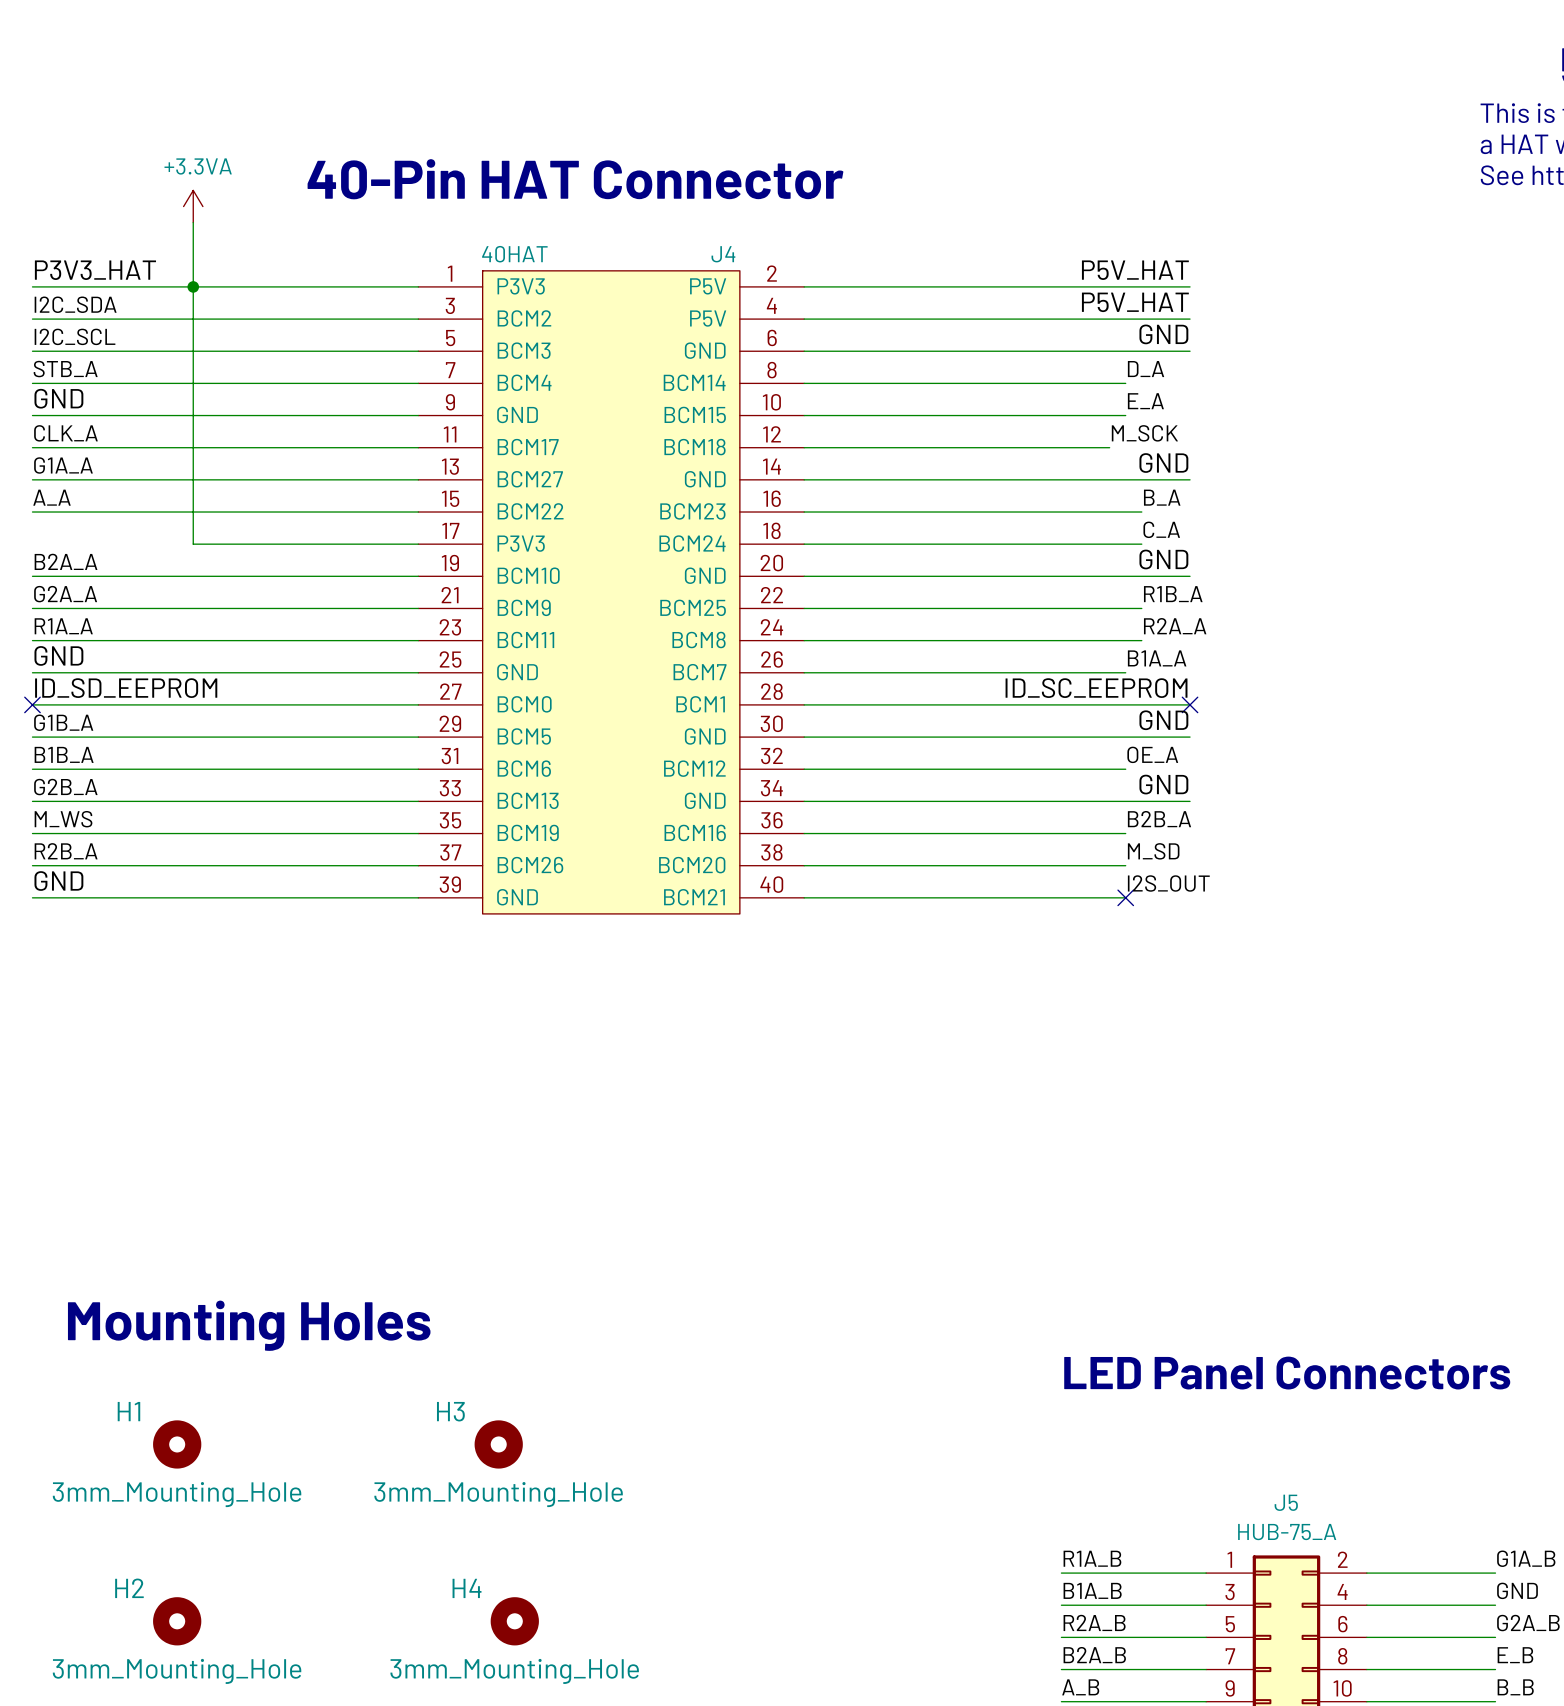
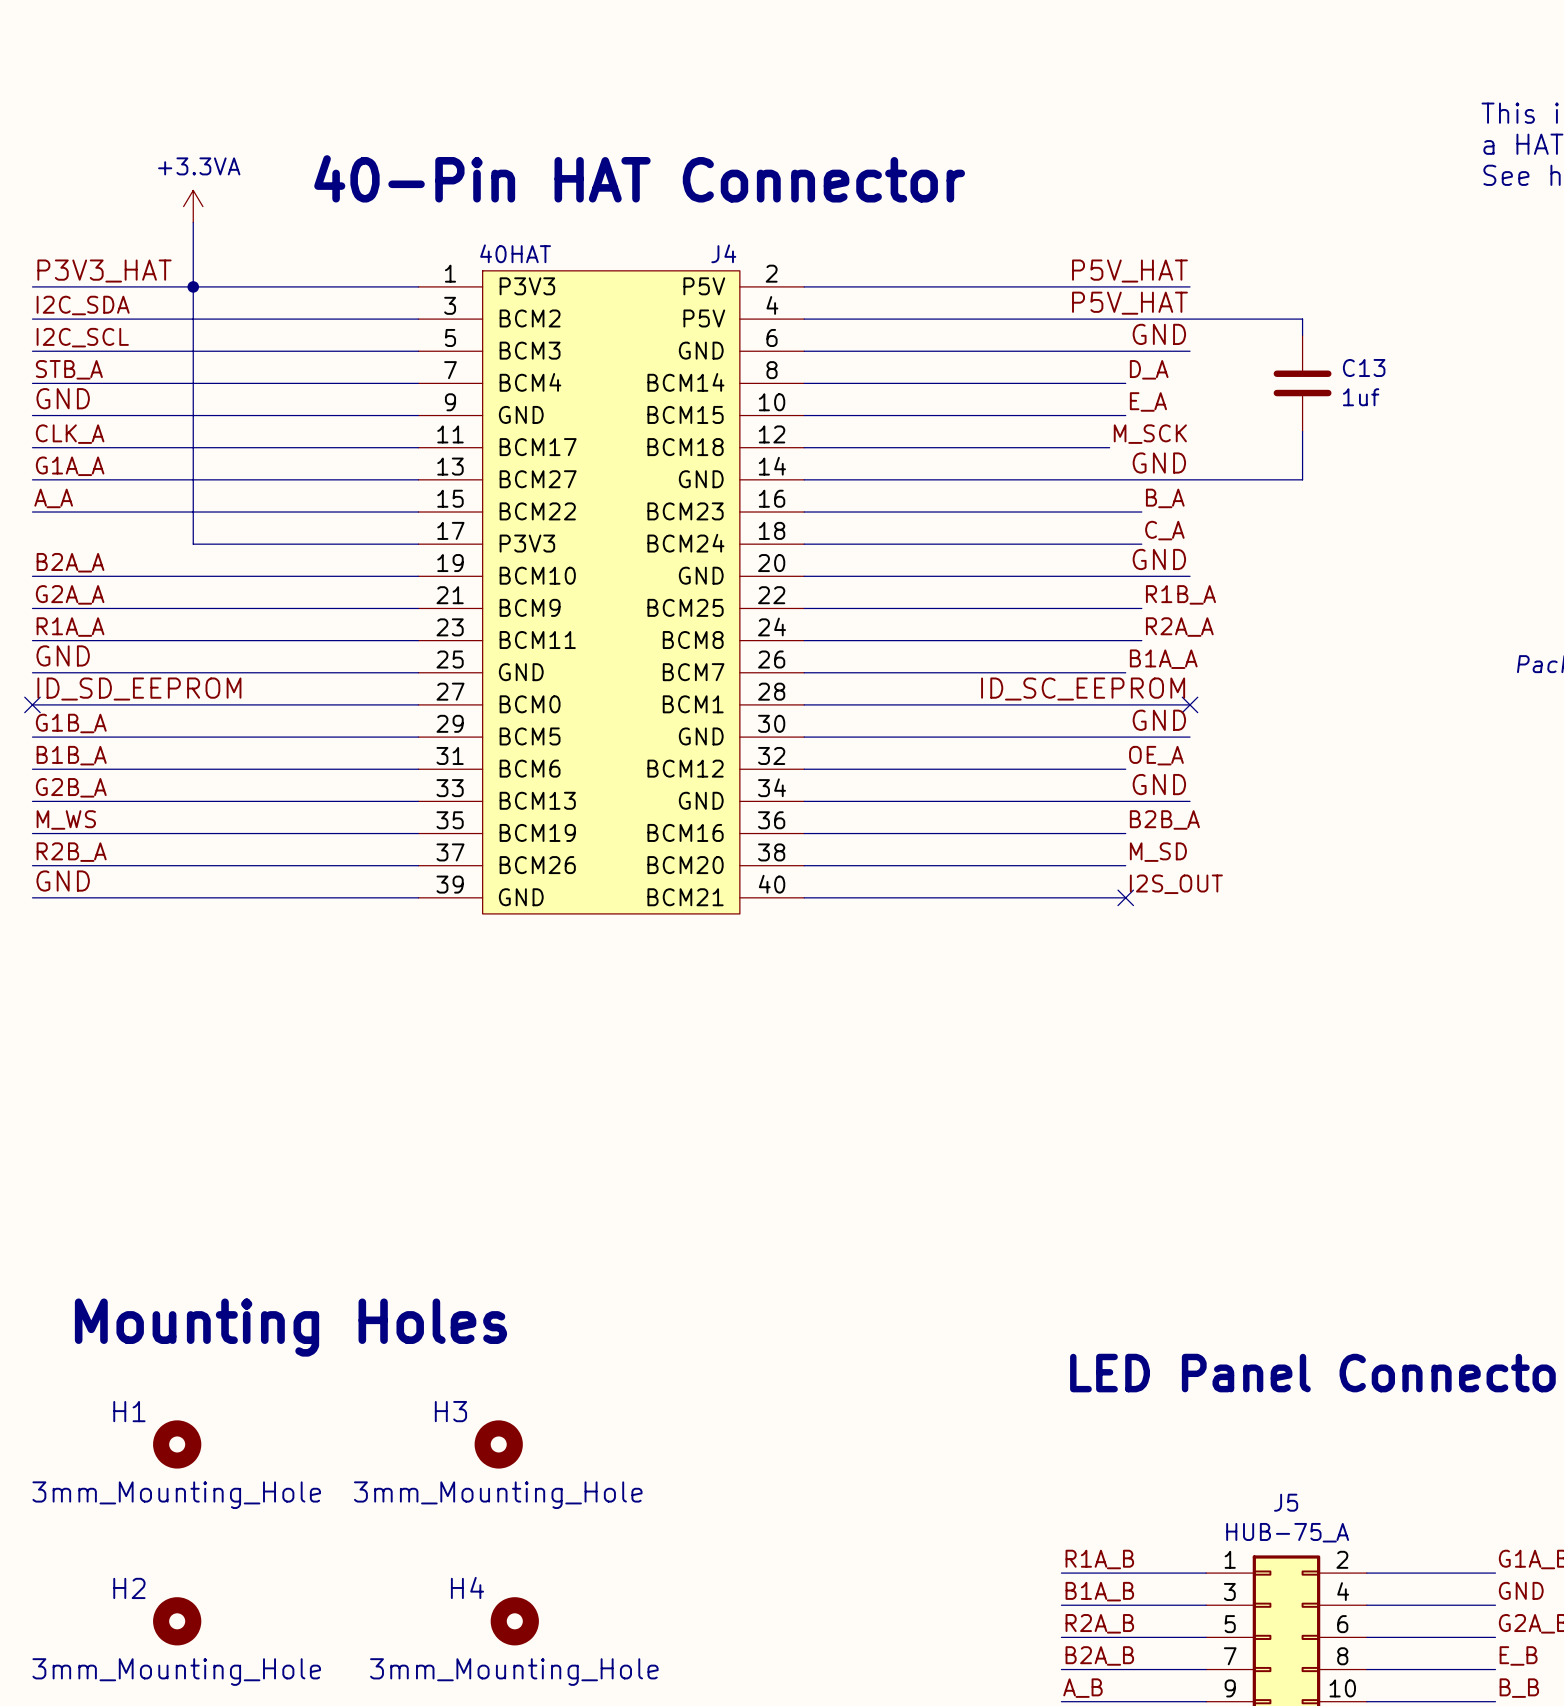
wire: none -> (1190, 319) (1302, 319) (1302, 335)
C13: none -> 1uf (1302, 383)
wire: none -> (1302, 431) (1302, 479) (1190, 479)

